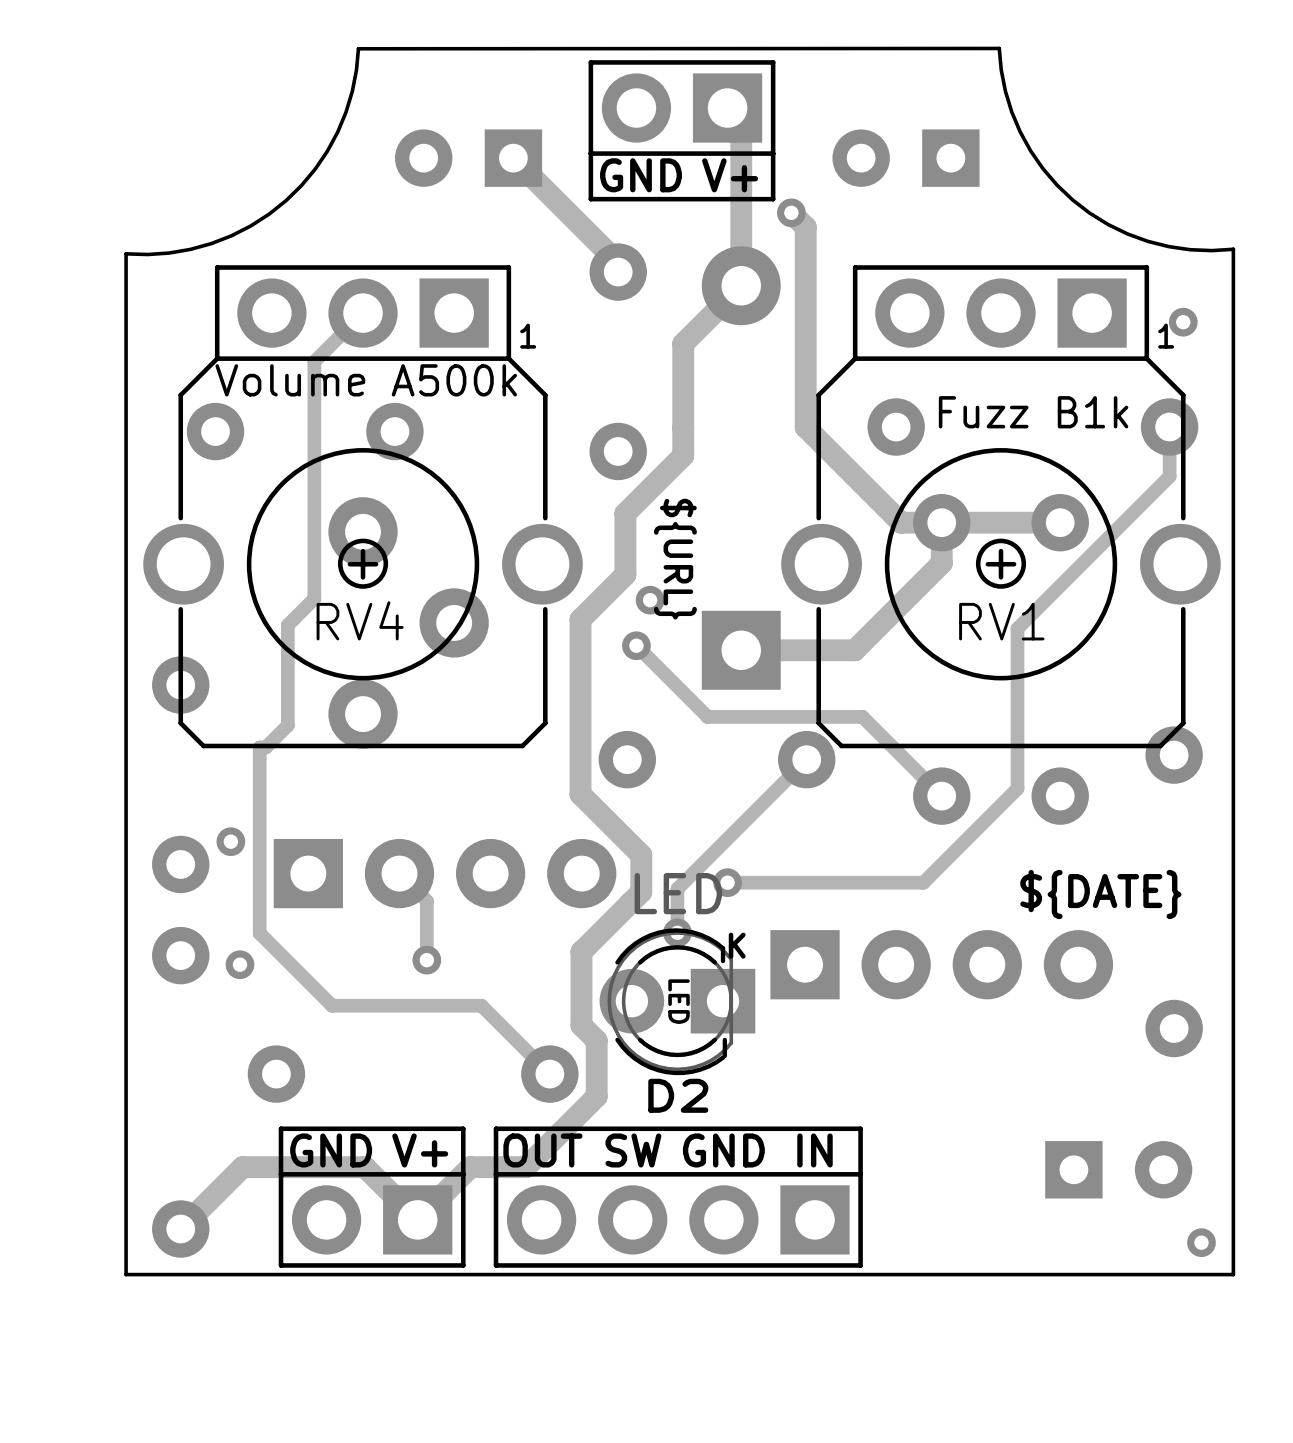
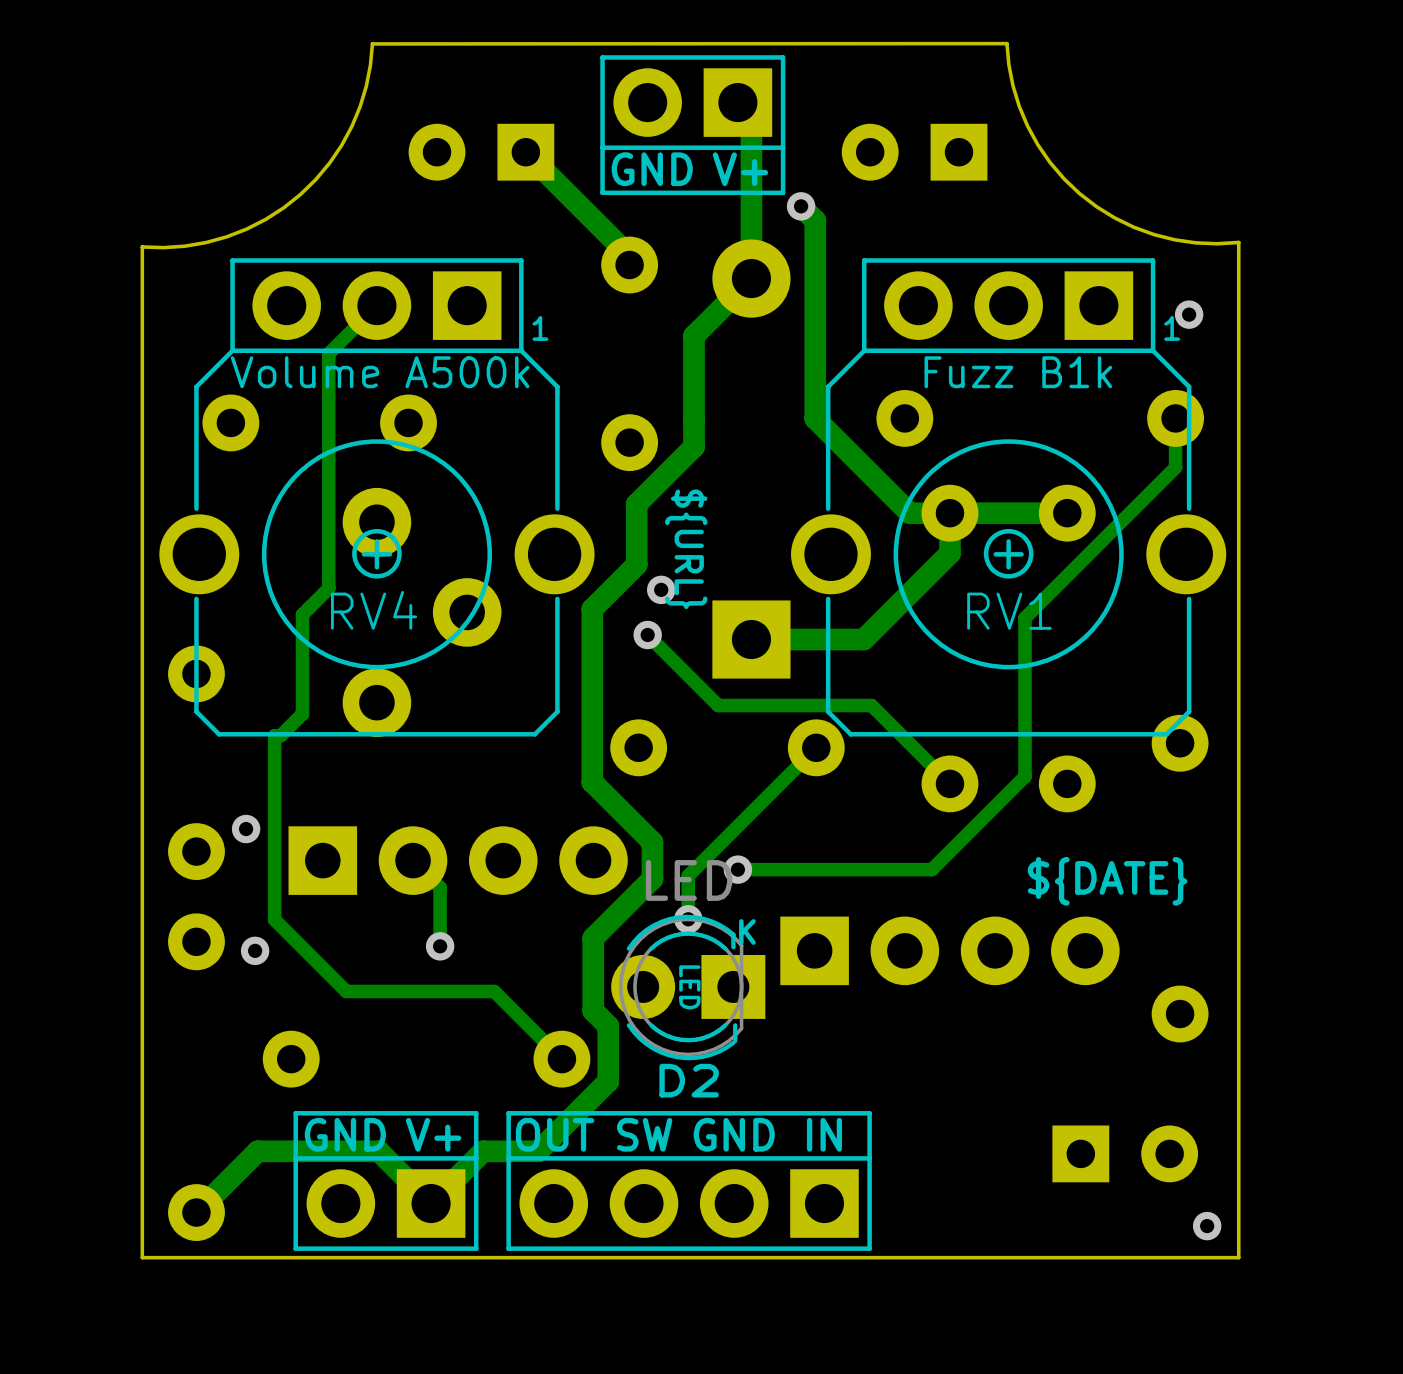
RV1 value position: Fuzz B1k (1033, 412) -> Fuzz B1k (1018, 372)

